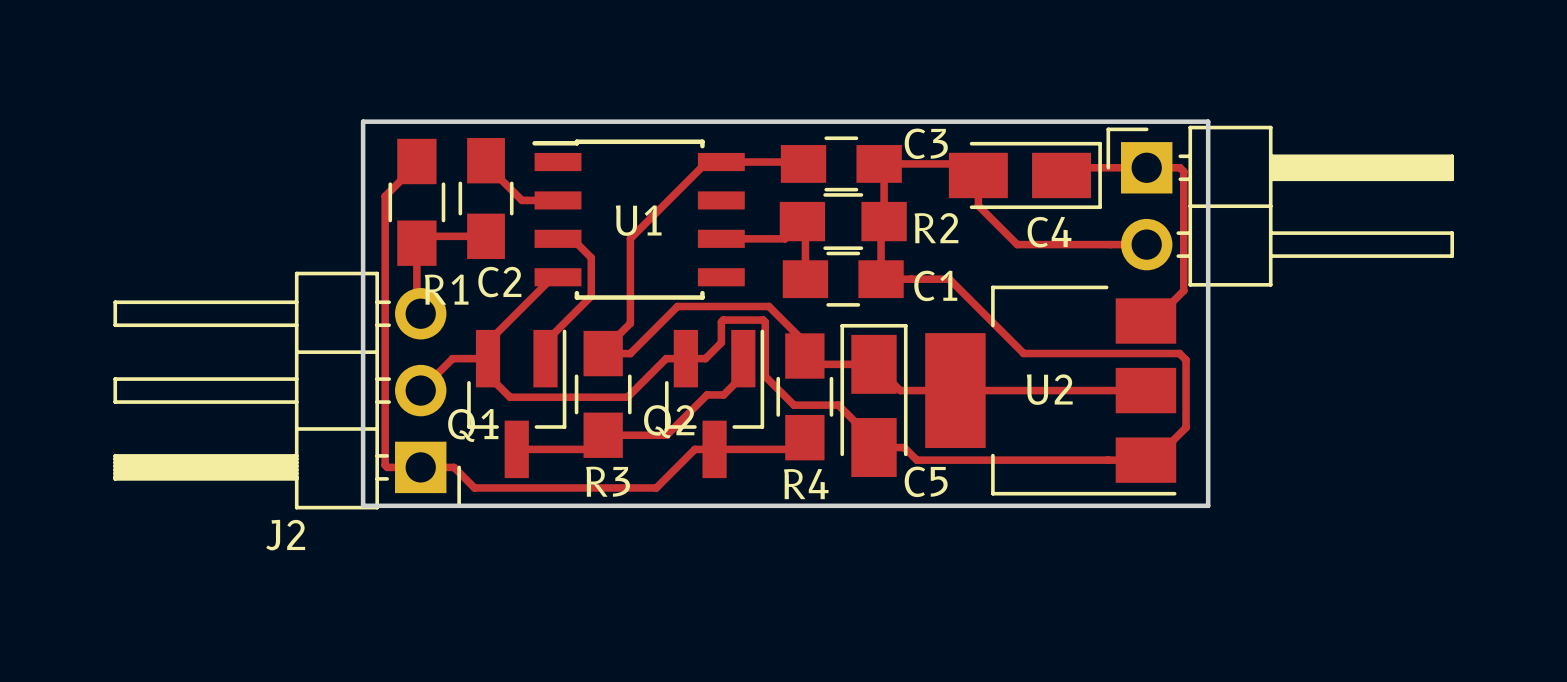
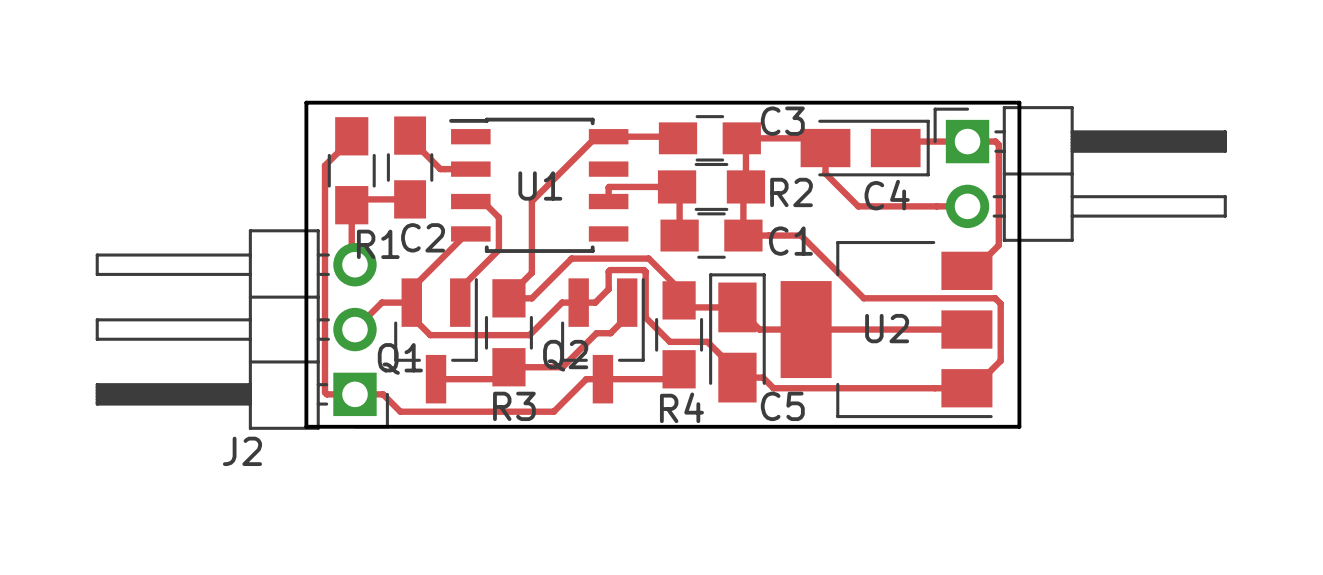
track: (802, 221) (785, 238) (721, 238) -> (677, 186) (609, 186) (608, 201)

